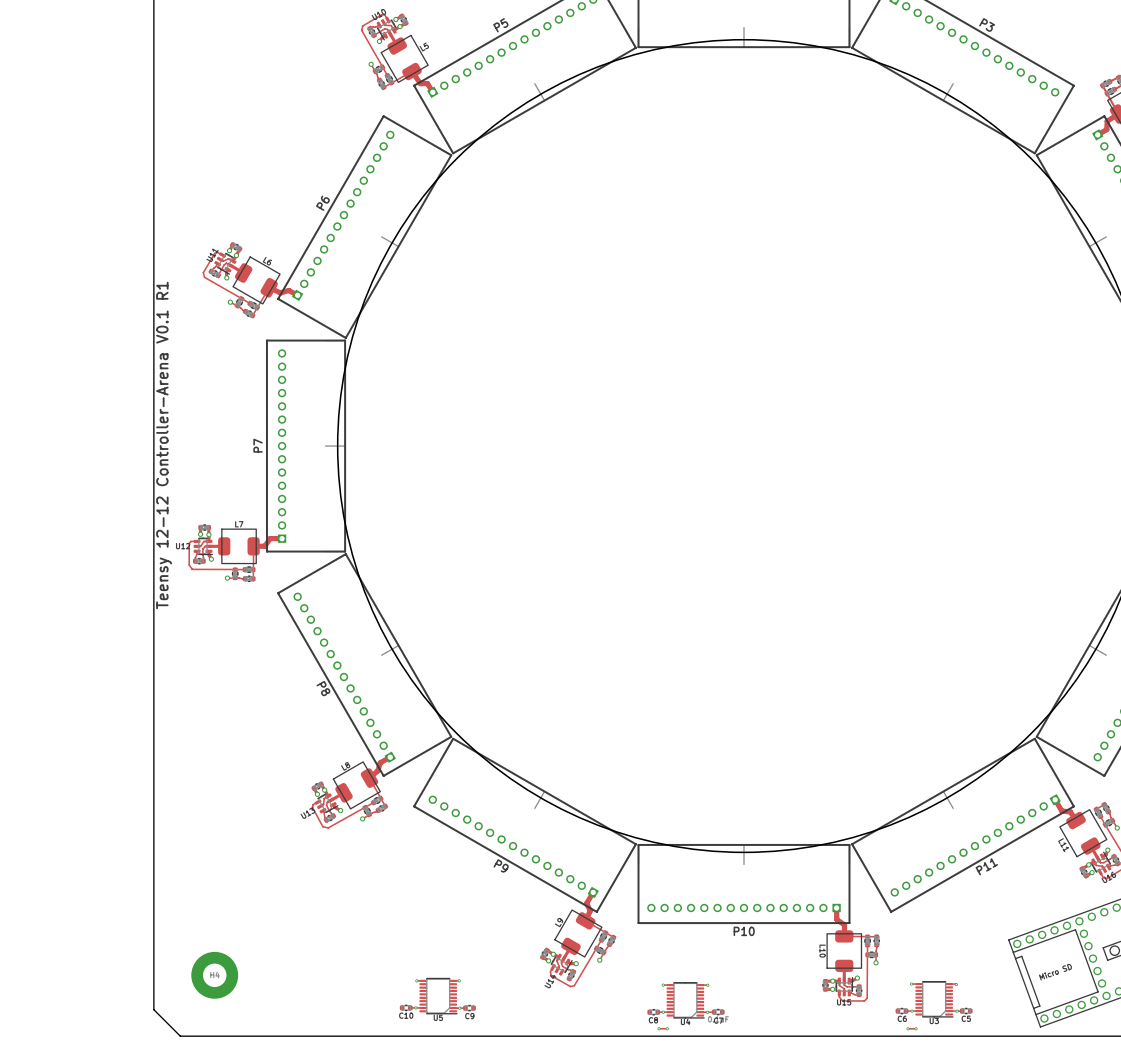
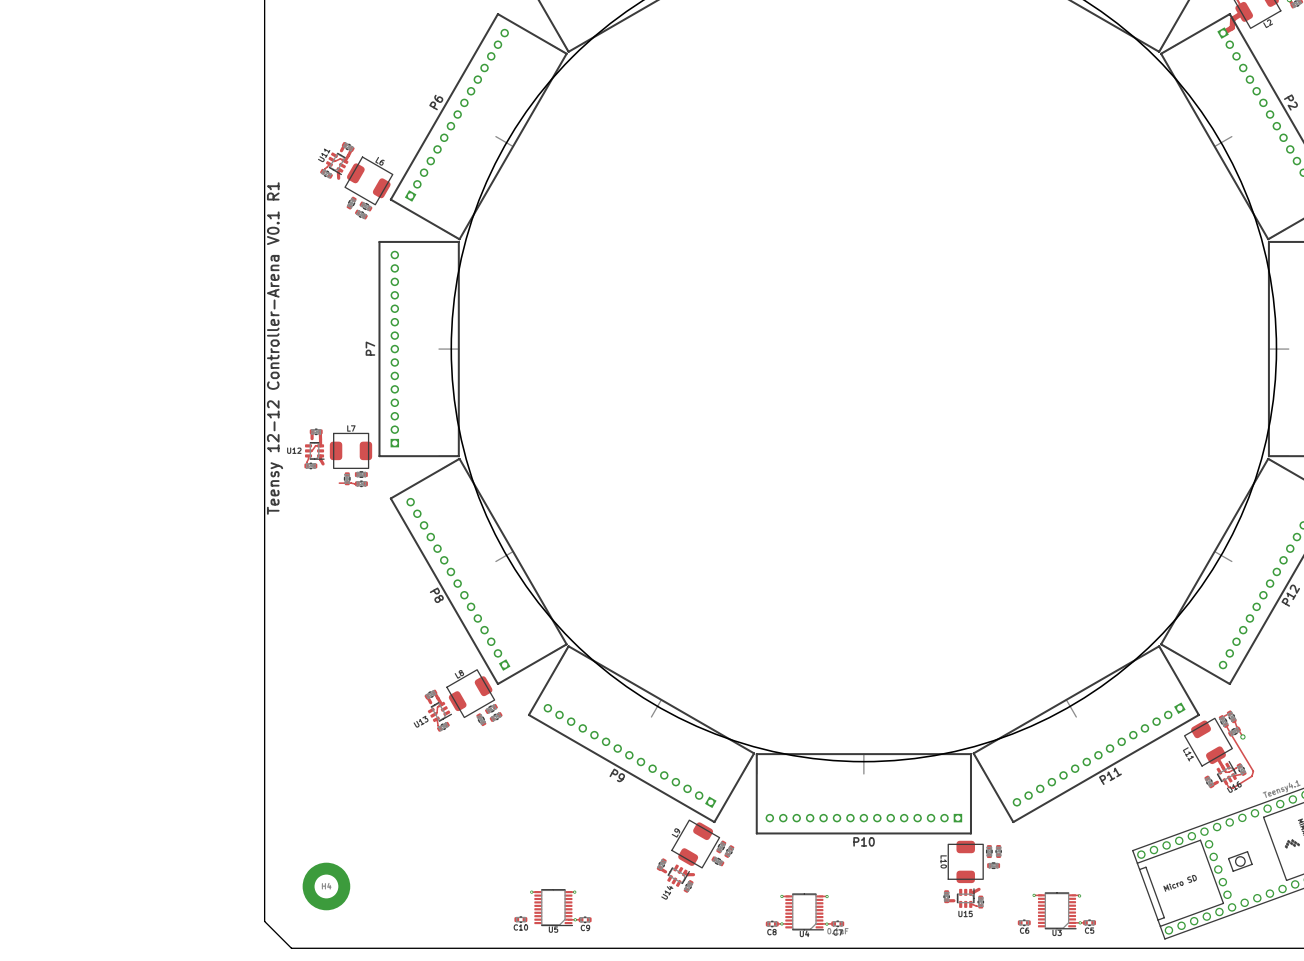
via: (229, 250) -> none
track: (222, 255) (217, 252) (214, 253) (203, 272) (204, 277) (249, 303) -> none
via: (236, 255) -> none
track: (243, 273) (226, 263) (218, 275) -> none
via: (226, 277) -> none
track: (297, 295) (288, 290) (280, 292) (269, 287) (252, 315) -> none
track: (230, 302) (245, 311) -> none
via: (230, 302) -> none
via: (200, 534) -> none
via: (208, 534) -> none
track: (282, 538) (270, 538) (264, 546) (253, 546) (253, 578) -> none
track: (197, 541) (191, 541) (189, 543) (189, 565) (192, 569) (244, 569) -> none
track: (224, 546) (205, 546) (202, 548) (203, 561) -> none
via: (211, 559) -> none
via: (227, 578) -> none
track: (390, 757) (380, 762) (377, 770) (369, 778) (385, 806) -> none
via: (324, 790) -> none
track: (343, 792) (327, 802) (326, 805) (333, 816) -> none
via: (317, 794) -> none
track: (1055, 799) (1061, 810) (1070, 811) (1076, 820) -> none
track: (318, 802) (313, 804) (312, 807) (322, 826) (328, 827) (373, 802) -> none
track: (333, 804) (340, 810) -> none
via: (340, 810) -> none
track: (378, 810) (362, 818) -> none
via: (362, 818) -> none
track: (1107, 850) (1102, 856) -> none
via: (1107, 850) -> none
via: (1088, 864) -> none
track: (1082, 868) (1094, 861) (1096, 865) (1102, 866) (1104, 869) -> none
via: (1092, 872) -> none
track: (593, 892) (586, 903) (590, 910) (585, 920) (613, 937) -> none
track: (836, 907) (836, 919) (844, 925) (844, 936) (876, 936) -> none
track: (601, 940) (574, 985) (570, 986) (551, 975) (550, 971) (553, 967) -> none
track: (609, 944) (599, 960) -> none
track: (876, 944) (876, 962) -> none
track: (867, 945) (867, 998) (864, 1000) (842, 1000) (839, 997) (839, 992) -> none
track: (570, 946) (561, 963) (562, 966) (573, 971) -> none
track: (546, 950) (559, 957) (556, 960) (559, 966) (557, 969) -> none
via: (553, 954) -> none
via: (548, 960) -> none
via: (599, 960) -> none
via: (876, 962) -> none
via: (576, 963) -> none
track: (844, 965) (844, 985) (859, 986) -> none
via: (857, 978) -> none
track: (825, 981) (839, 981) (839, 985) (844, 988) (844, 992) -> none
via: (832, 981) -> none
via: (832, 989) -> none
track: (410, 1007) (423, 1007) -> none
via: (415, 1007) -> none
track: (906, 1011) (919, 1011) -> none
via: (912, 1011) -> none
track: (659, 1028) (667, 1028) -> none
via: (659, 1028) -> none
via: (667, 1028) -> none
track: (908, 1028) (916, 1028) -> none
via: (908, 1028) -> none
via: (916, 1028) -> none

